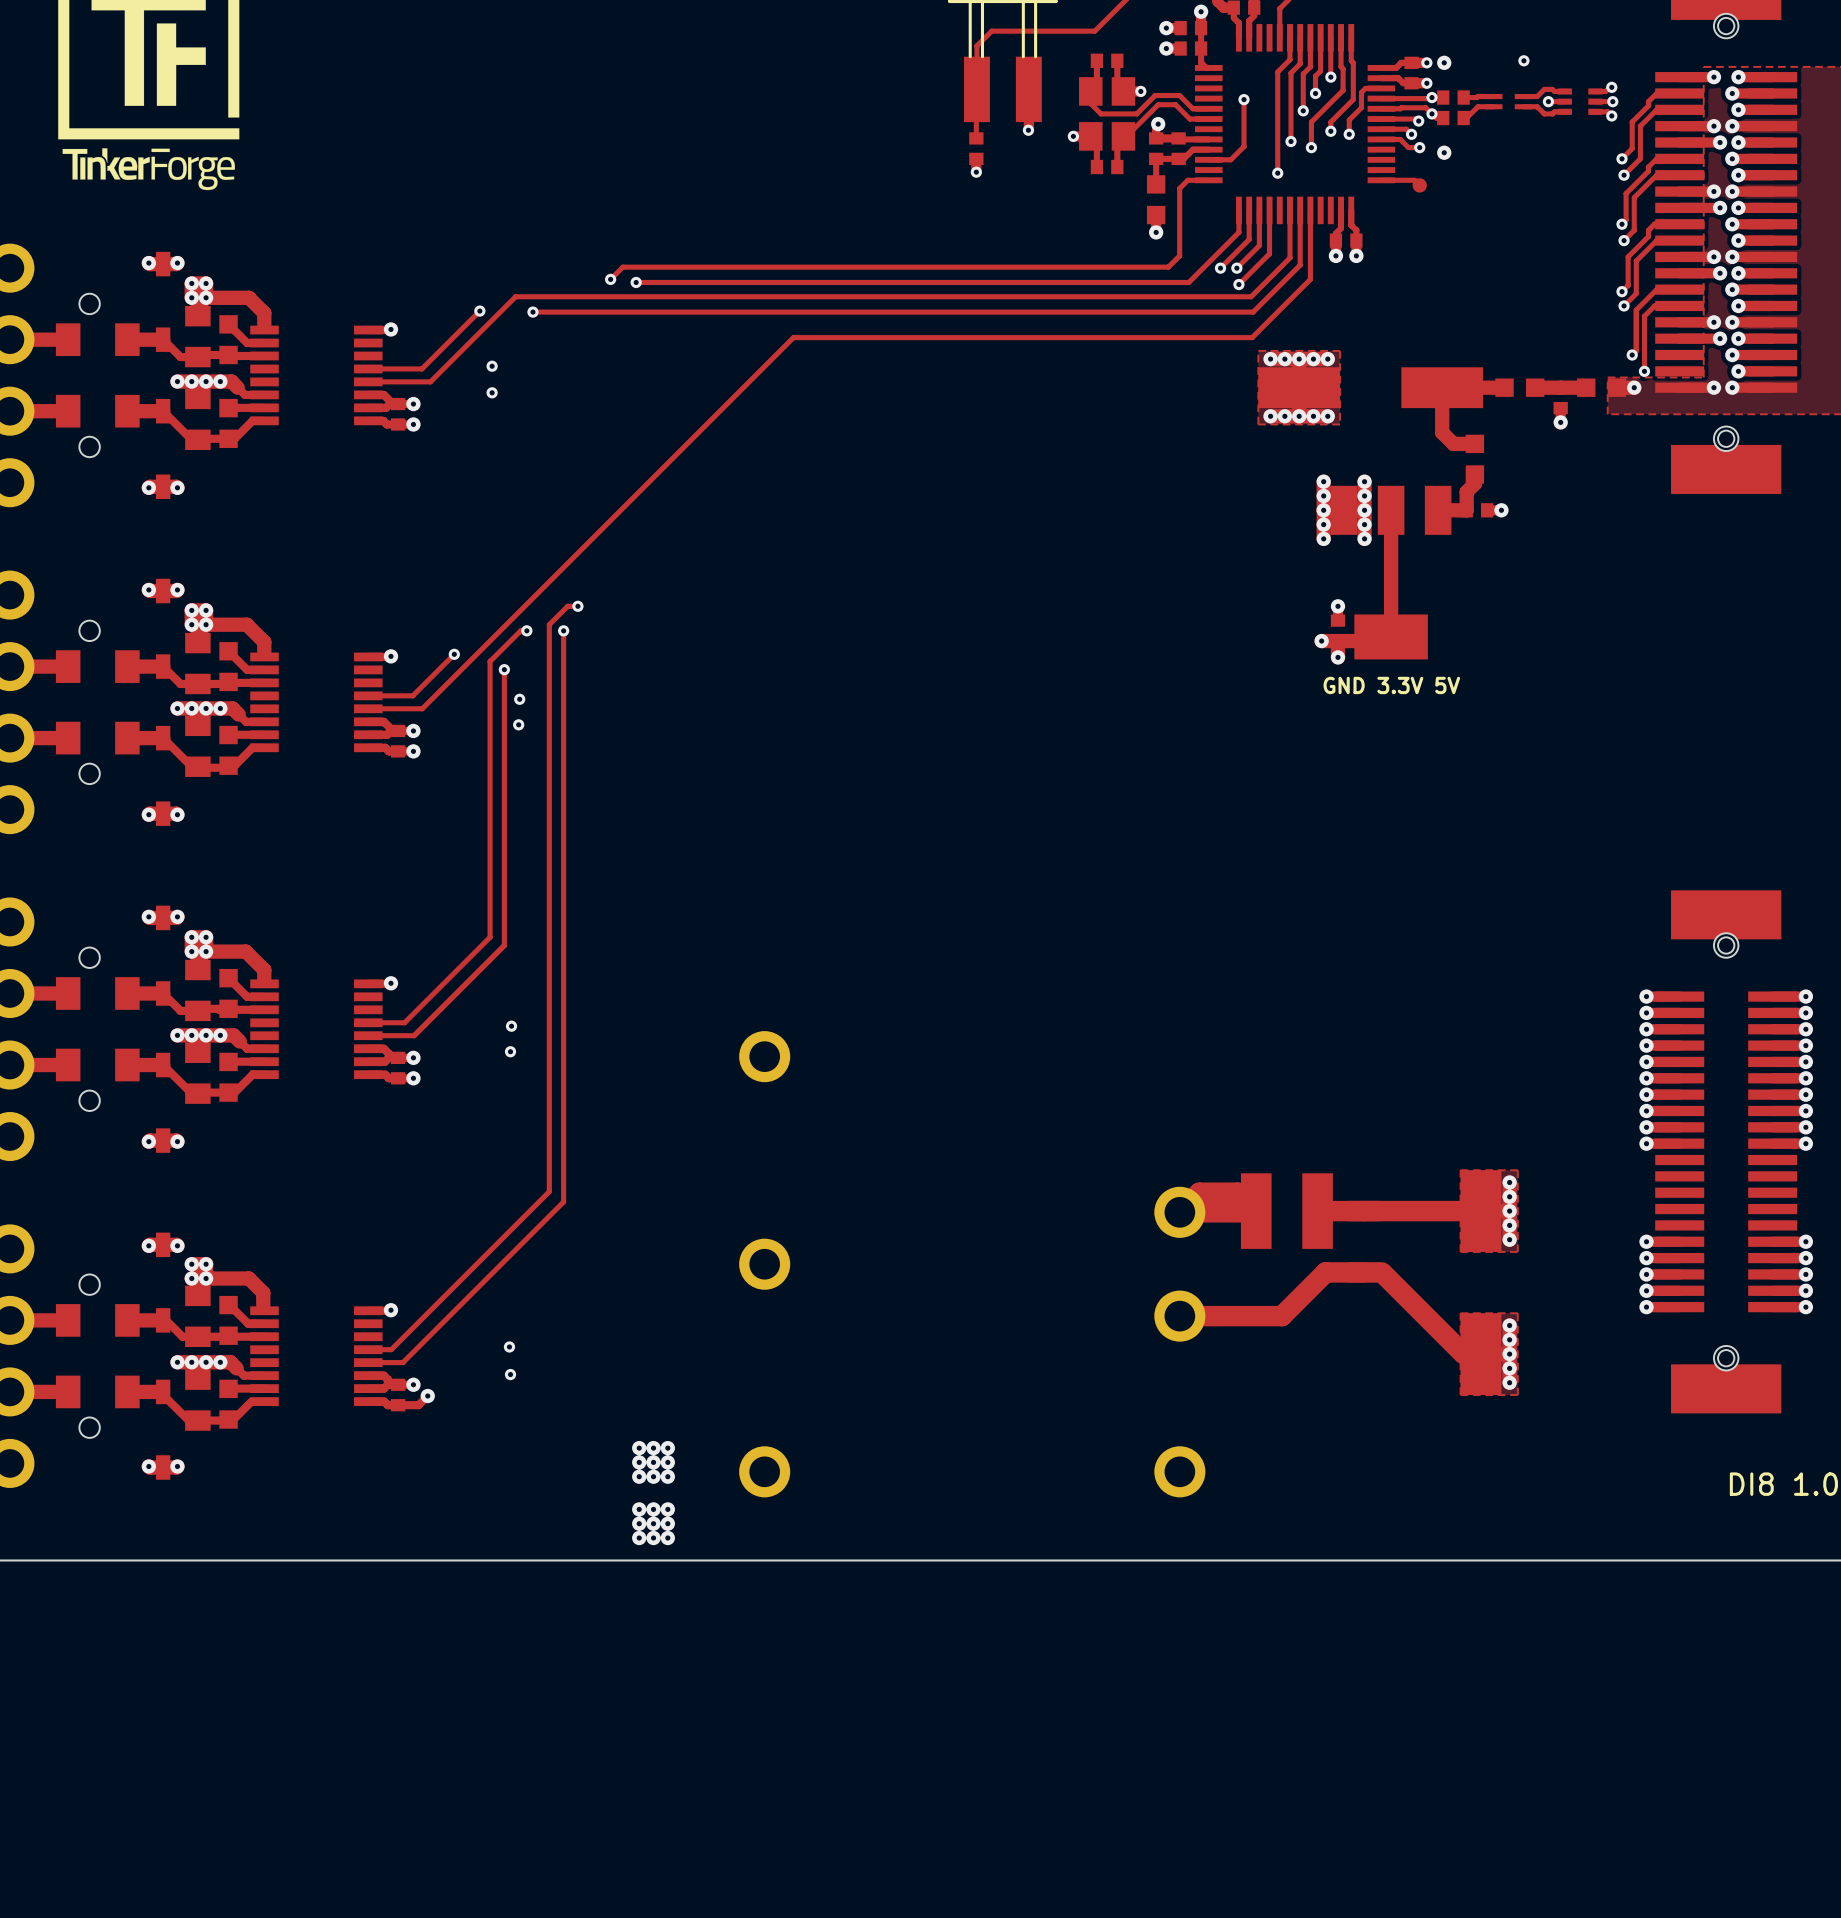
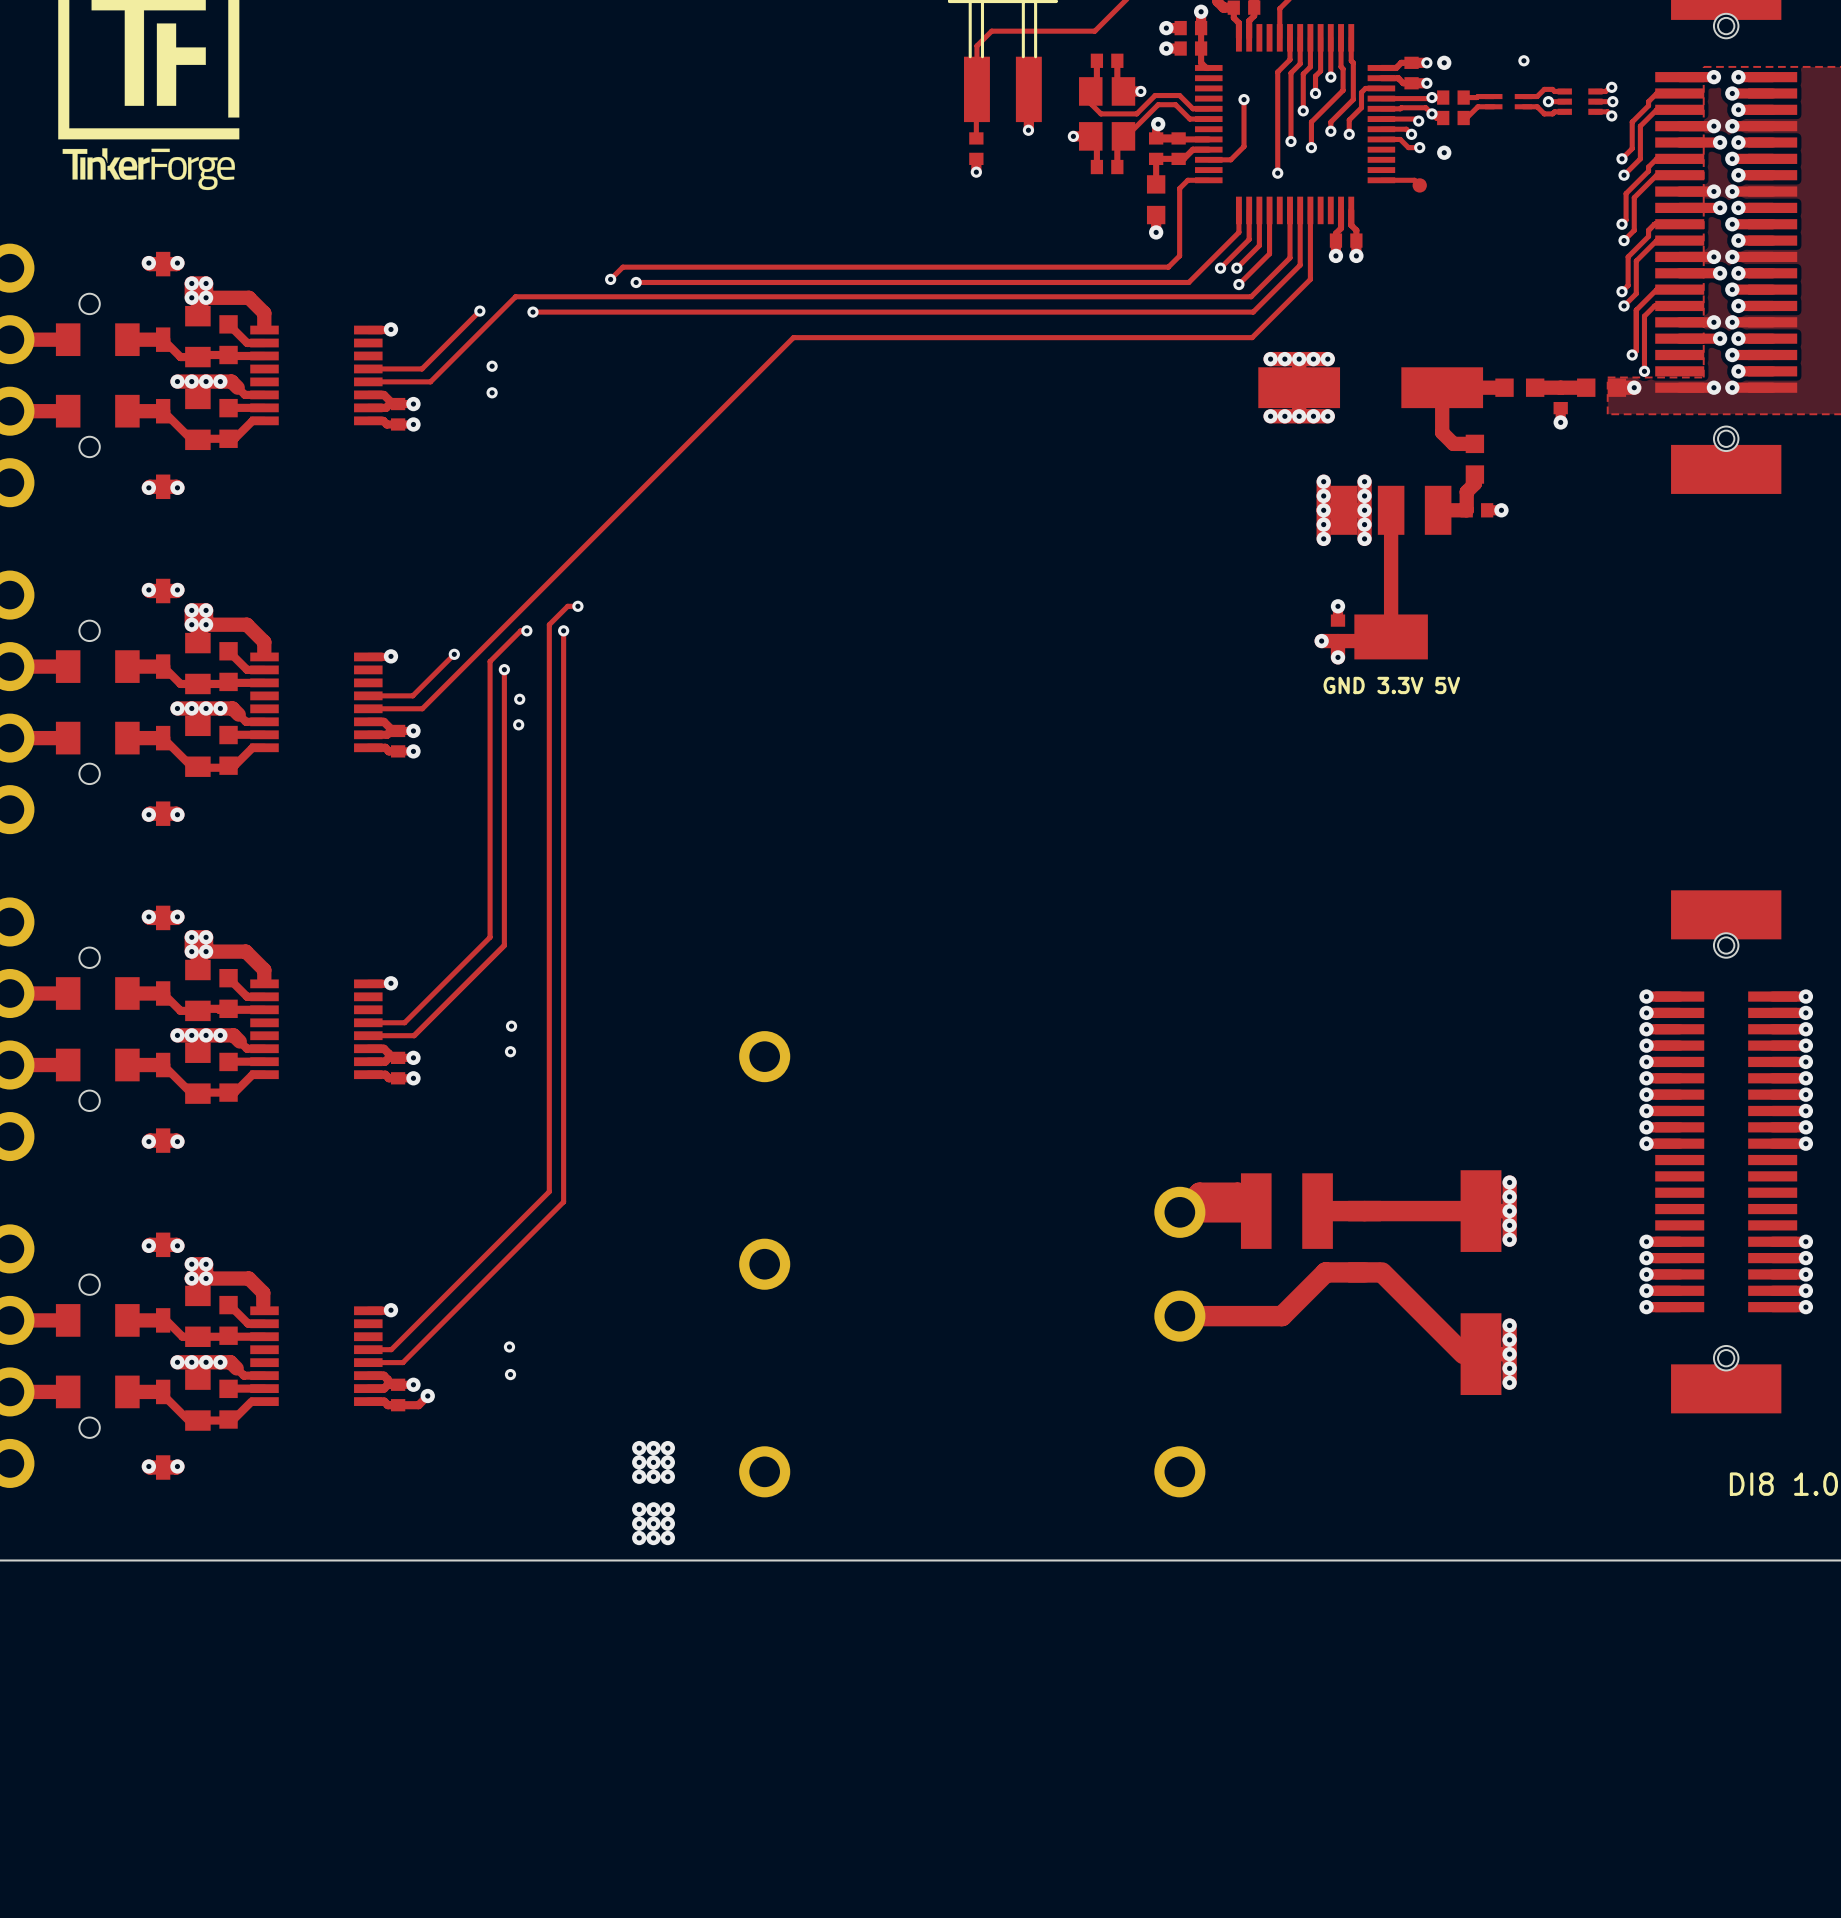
zone outline: (1258, 350) (1340, 350) (1340, 424) (1258, 424) (1258, 350) -> none
zone outline: (1460, 1170) (1517, 1170) (1517, 1251) (1460, 1251) (1460, 1170) -> none
zone outline: (1460, 1313) (1460, 1394) (1517, 1394) (1517, 1313) (1460, 1313) -> none

